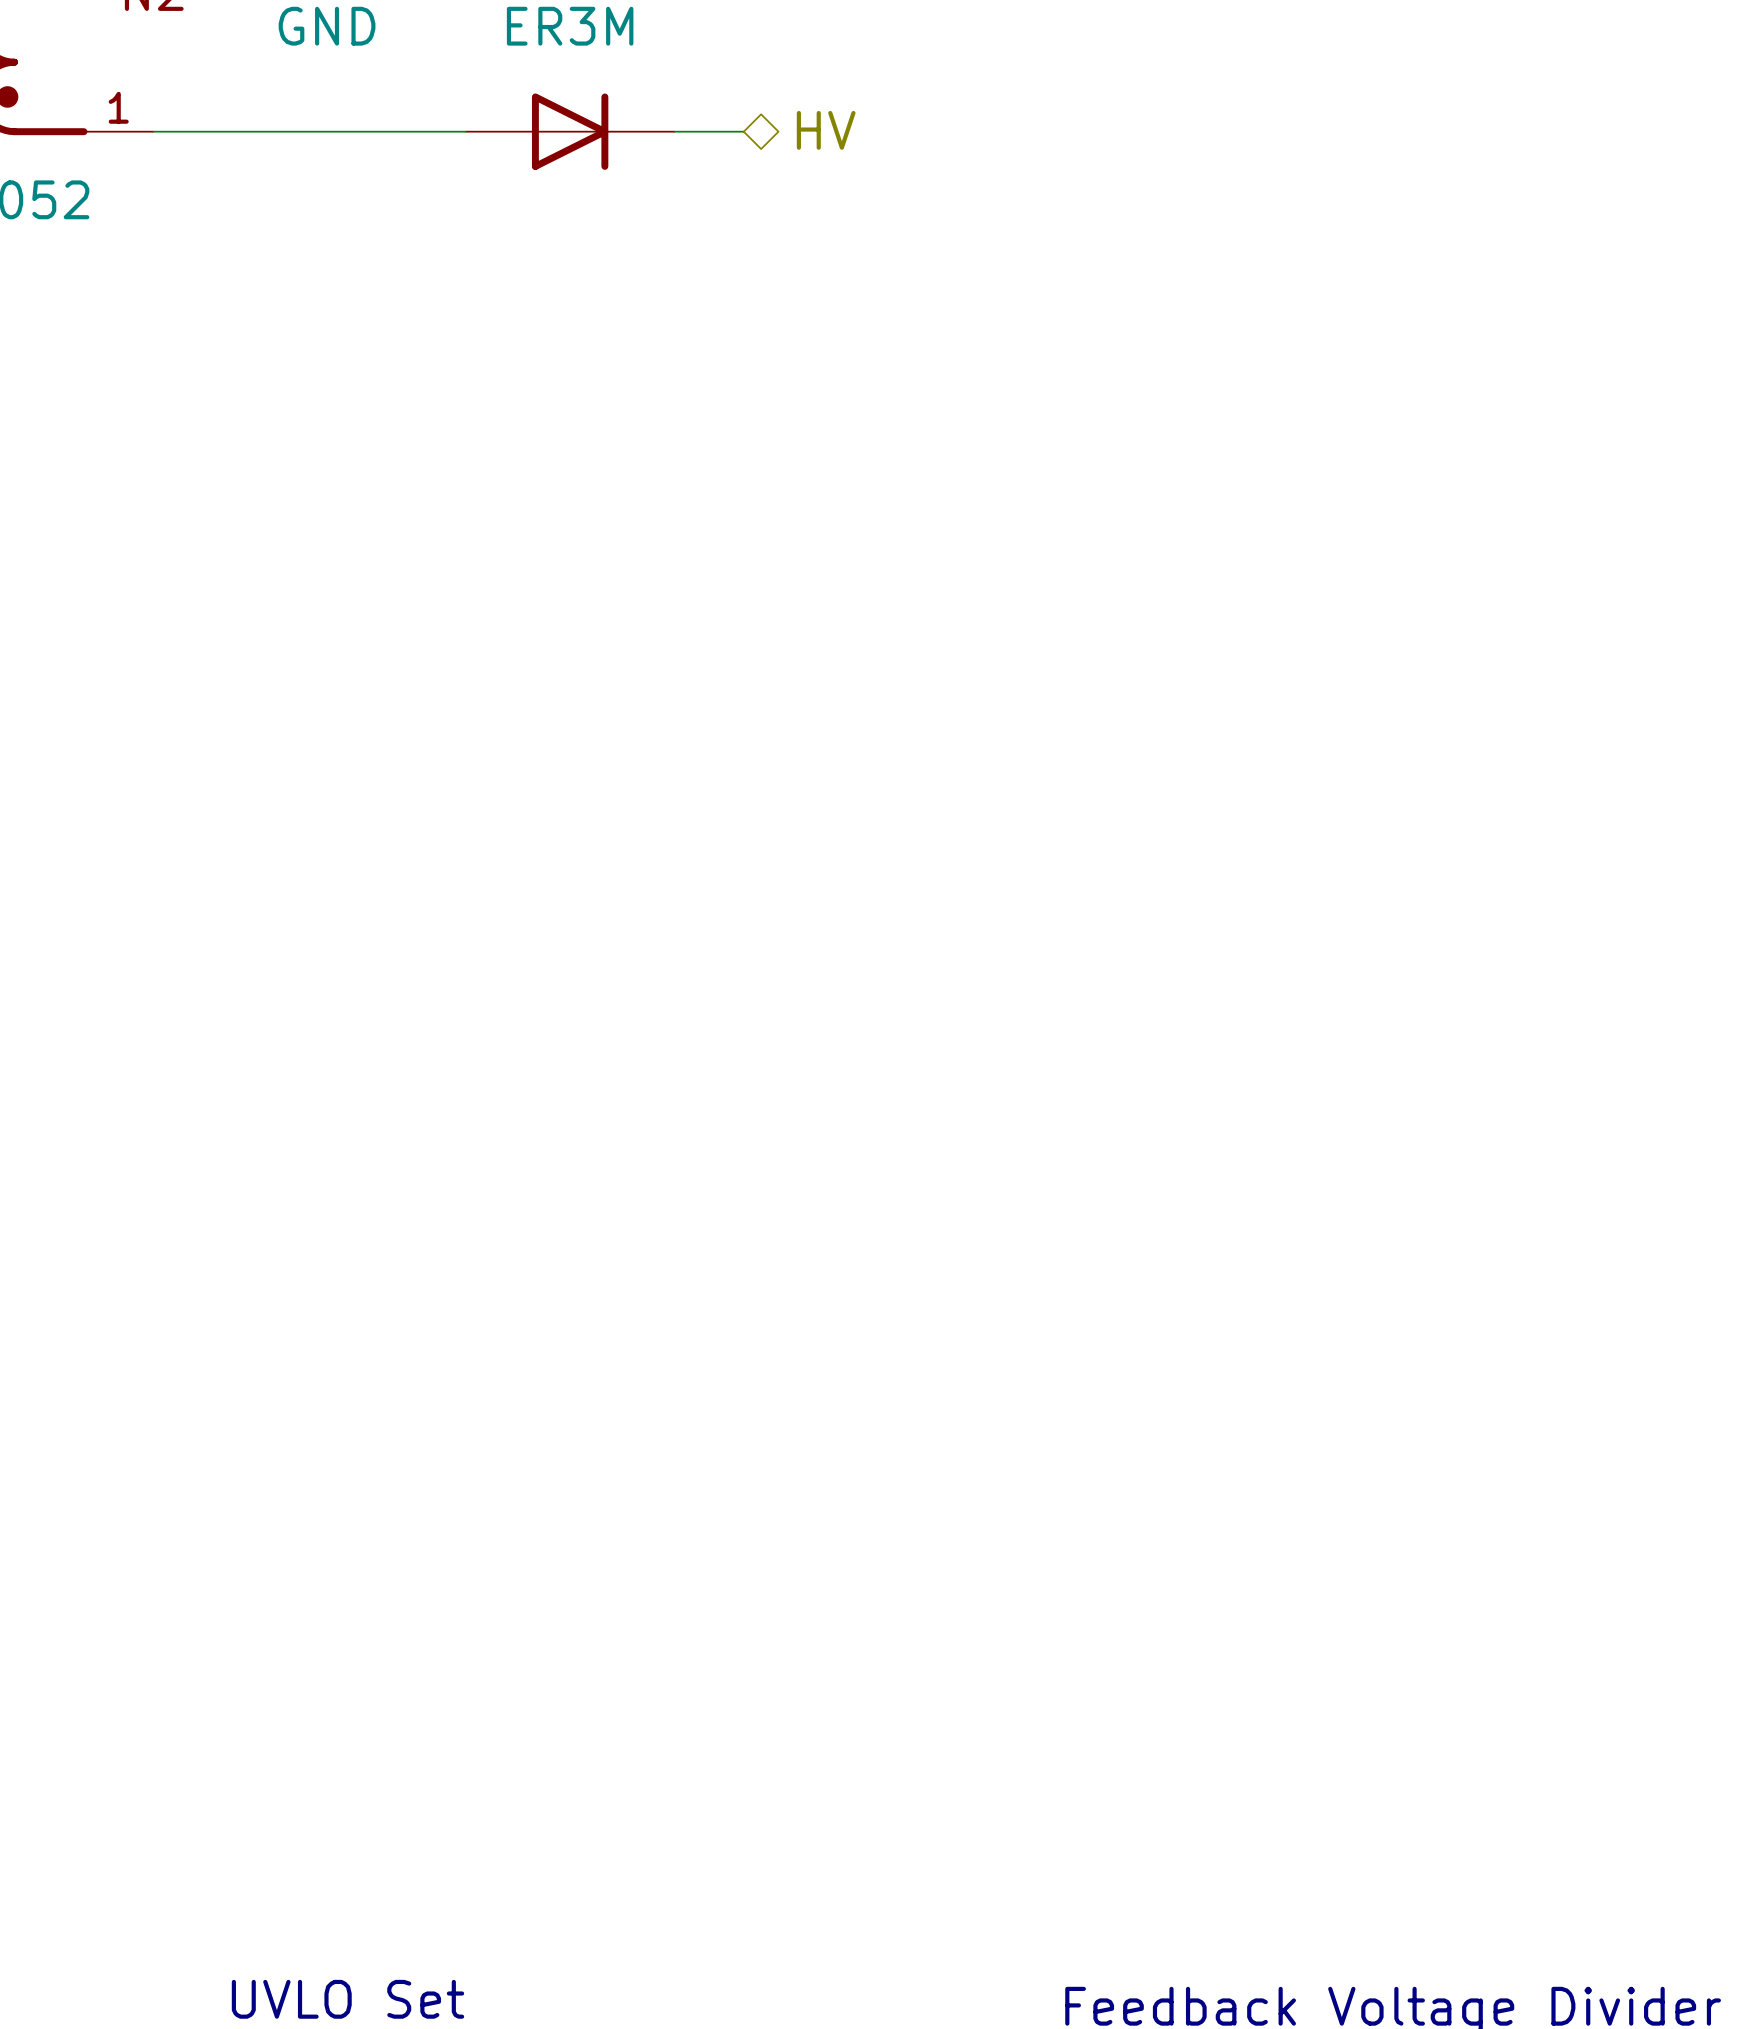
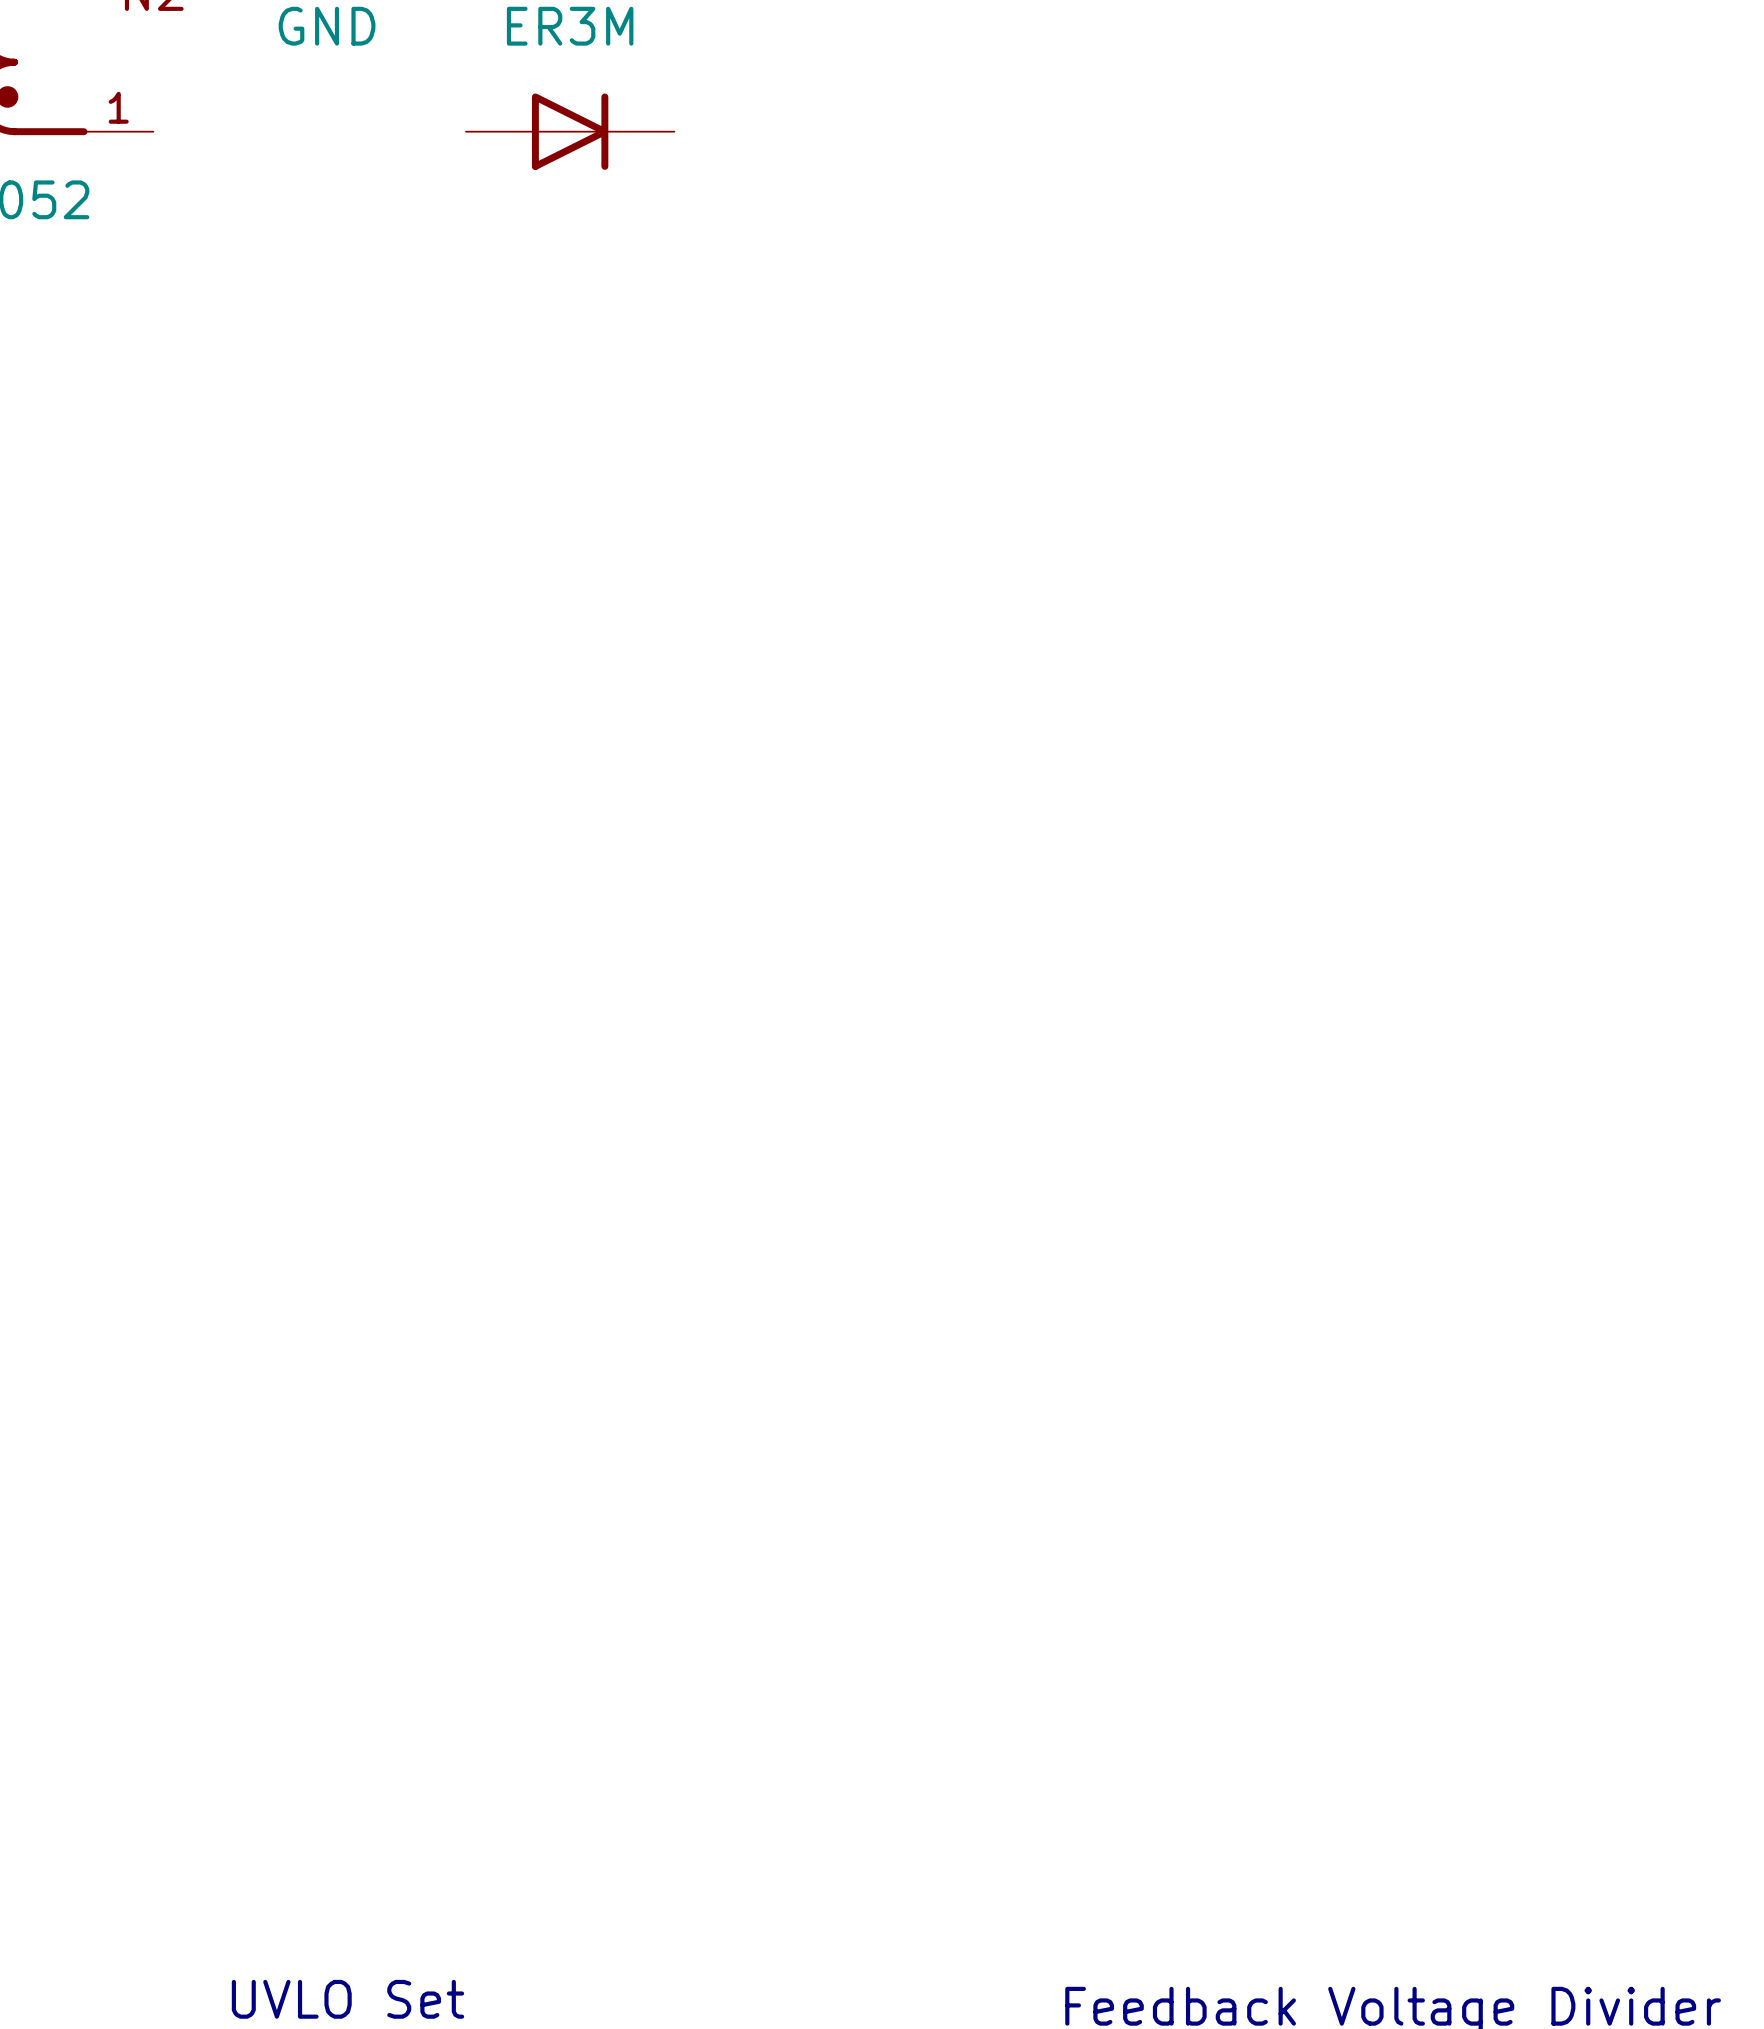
hierarchical label: HV (826, 130) -> none
wire: (153, 131) (465, 131) -> none
wire: (674, 131) (743, 131) -> none

